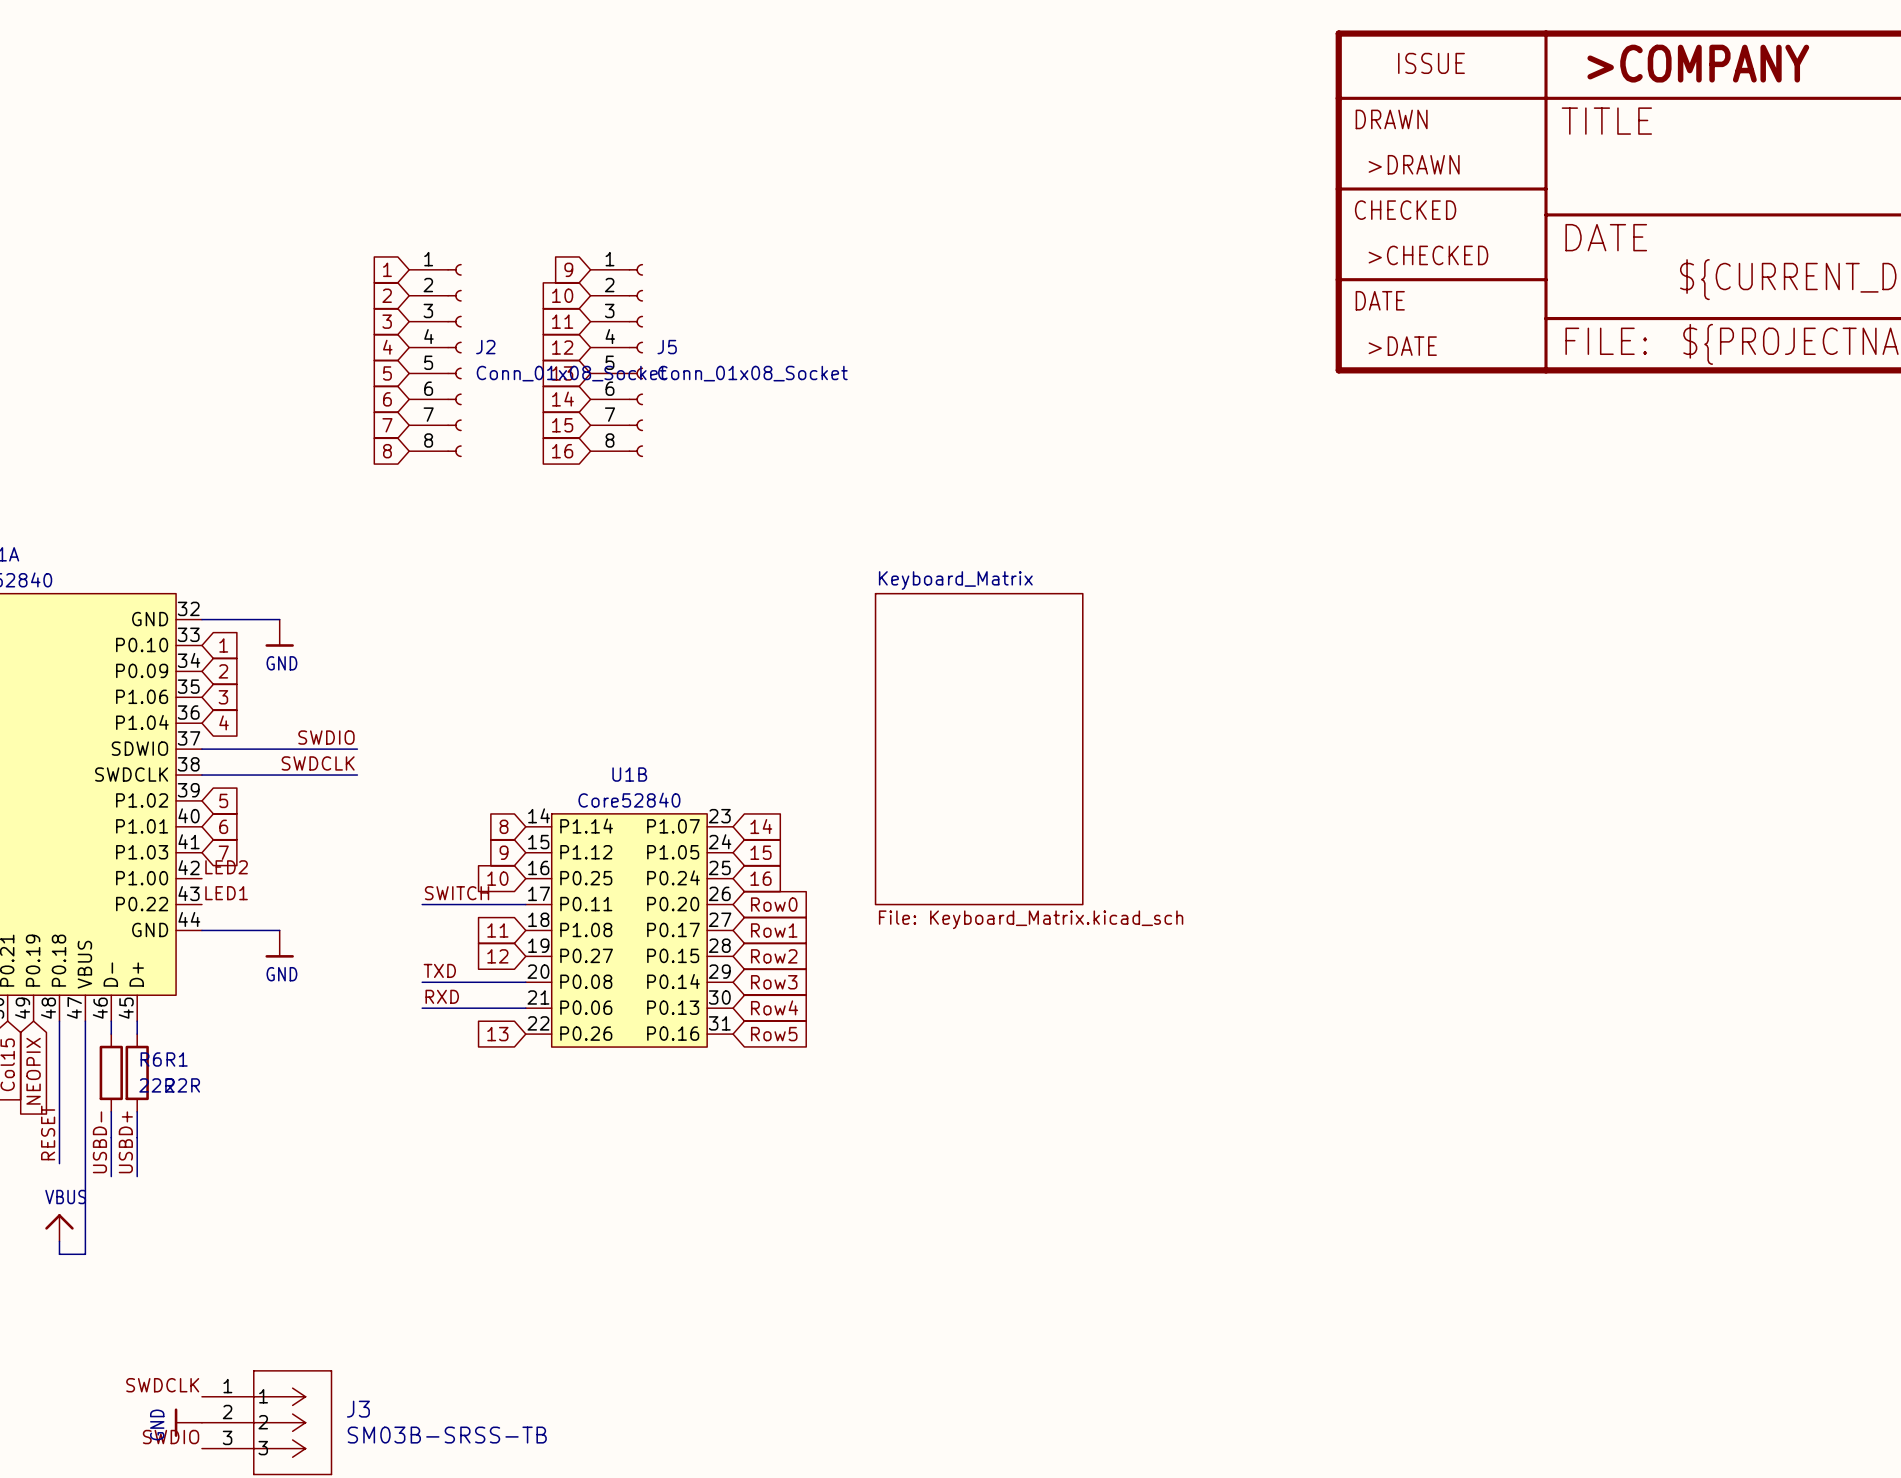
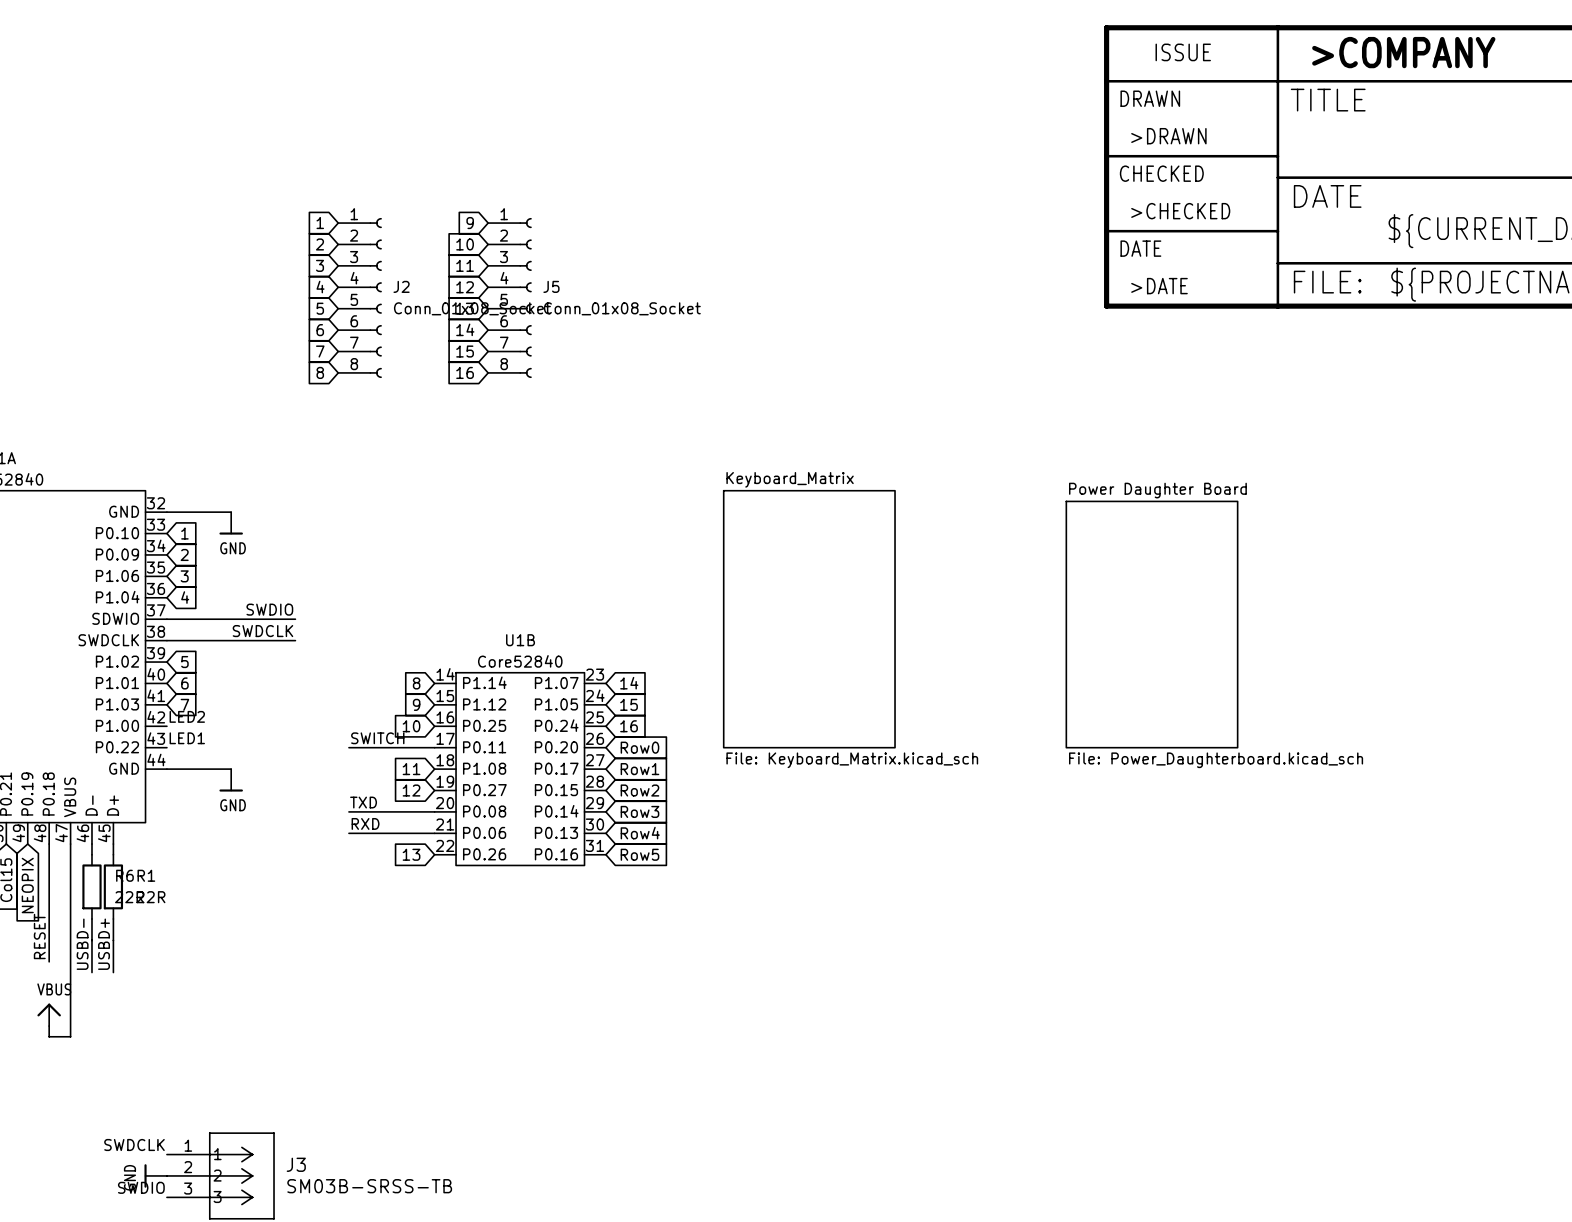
sheet Power Daughter Board: none -> File: Power_Daughterboard.kicad_sch (1151, 624)

